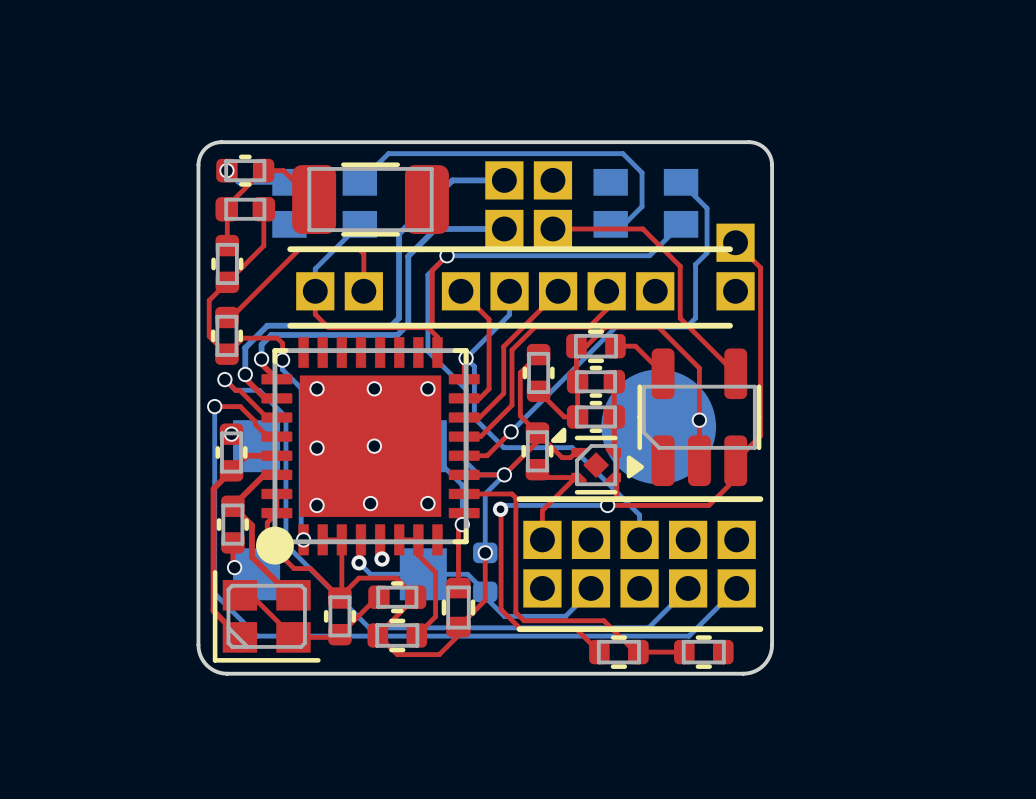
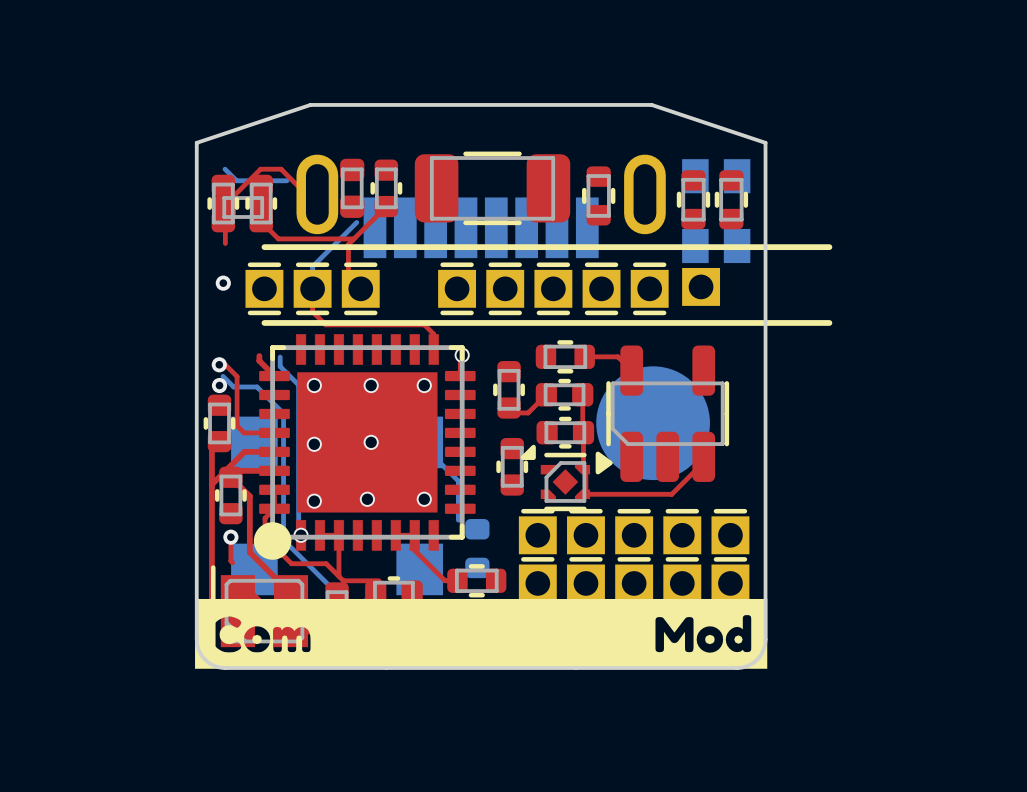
part footprint: [485, 161, 524, 200] -> [414, 151, 571, 226]
board edge: (198, 165) (200, 156) (205, 148) (212, 143) (221, 142) (749, 142) (757, 143) (765, 148) (770, 156) (772, 165) -> (196, 163) (196, 142) (310, 104) (651, 104) (765, 142) (765, 163)
via: (226, 170) -> none
part: (245, 170) -> none
bottom track: (504, 180) (452, 180) (399, 233) (399, 318) (391, 325) (267, 325) (245, 347) (245, 374) -> none
part: (552, 180) -> none
bottom track: (359, 182) (388, 153) (622, 153) (642, 172) (642, 206) (624, 224) (610, 224) -> none
bottom track: (681, 182) (707, 208) (707, 253) (695, 264) (695, 318) (686, 326) (615, 326) (511, 431) -> none
part: none -> (352, 188)
part: none -> (386, 188)
part: none -> (598, 195)
part: (370, 199) -> none
part: none -> (693, 199)
part: none -> (731, 199)
part: (324, 203) -> none
part rotation: 0° (645, 203) -> 90° clockwise (716, 211)
part position: (645, 203) -> (716, 211)
part: none -> (223, 203)
part: none -> (261, 203)
part: none -> (481, 206)
top track: (263, 209) (263, 245) (209, 300) (209, 336) (226, 354) (243, 338) (277, 338) (282, 343) (282, 360) -> none
top track: none -> (261, 221) (278, 238) (353, 238)
bottom track: (681, 224) (649, 255) (447, 255) (427, 274) (427, 351) (466, 389) (466, 462) (478, 474) (504, 474) (485, 493) (485, 552) -> none
bottom track: (504, 228) (435, 228) (408, 256) (408, 324) (397, 334) (271, 334) (261, 344) (261, 359) -> none
part: (504, 228) -> none
top track: (552, 228) (642, 228) (680, 266) (680, 318) (735, 373) -> none
part: (552, 228) -> none
top track: (735, 242) (760, 267) (760, 435) (735, 460) (735, 478) (708, 505) (607, 505) (616, 496) (614, 381) -> none
part: (735, 242) -> none
line: none -> (264, 247) (287, 247)
line: none -> (723, 247) (829, 247)
top track: (447, 255) (432, 270) (432, 323) (428, 327) -> none
via: (447, 255) -> none
part: (227, 263) -> none
part footprint: [296, 272, 335, 311] -> [293, 262, 332, 316]
part footprint: [344, 272, 383, 311] -> [341, 262, 380, 316]
part footprint: [441, 272, 481, 311] -> [438, 262, 477, 316]
part footprint: [490, 272, 529, 311] -> [486, 262, 525, 316]
part footprint: [538, 272, 578, 311] -> [534, 262, 573, 316]
part footprint: [587, 272, 626, 311] -> [582, 262, 621, 316]
part footprint: [636, 272, 675, 311] -> [630, 262, 669, 316]
via: none -> (223, 283)
part: none -> (701, 286)
part: none -> (264, 288)
top track: (363, 291) (363, 254) (359, 249) (299, 249) (231, 317) (226, 317) -> (360, 288) (348, 276) (348, 244) (386, 206)
top track: (460, 291) (489, 319) (489, 389) (479, 398) (464, 398) -> none
bottom track: (509, 291) (509, 314) (466, 358) (474, 366) (474, 418) (503, 447) (572, 447) (639, 515) (639, 539) -> none
top track: (558, 291) (503, 346) (503, 393) (479, 417) (464, 417) -> none
top track: (606, 291) (606, 309) (589, 327) (535, 327) (512, 350) (512, 405) (480, 436) (464, 436) -> none
part: (735, 291) -> none
line: none -> (264, 322) (287, 322)
line: none -> (723, 322) (829, 322)
part: (226, 335) -> none
part position: (595, 346) -> (565, 356)
top track: (615, 346) (635, 346) (663, 373) -> none
top track: (538, 354) (520, 372) (520, 415) (562, 457) (570, 457) (575, 452) -> none
via: (261, 359) -> none
top track: none -> (584, 356) (617, 356) (631, 370)
via: (282, 360) -> none
via: none -> (219, 364)
part: (538, 372) -> none
top track: (245, 374) (245, 378) (265, 398) (276, 398) -> none
via: (245, 374) -> none
top track: (224, 379) (235, 390) (239, 390) (266, 417) (276, 417) -> none
via: (224, 379) -> none
part: (595, 381) -> none
via: none -> (219, 385)
top track: (538, 391) (564, 416) (577, 416) (576, 346) (586, 346) (605, 327) (658, 327) (699, 368) (699, 460) -> none
part: none -> (509, 389)
top track: none -> (546, 394) (528, 412) (512, 412)
part: none -> (564, 394)
top track: none -> (582, 394) (583, 467) (585, 469) (585, 494) (671, 494) (703, 462) (703, 456)
top track: (214, 406) (240, 406) (267, 436) -> (219, 364) (225, 364) (237, 376) (237, 425) (244, 432) (265, 432)
bottom track: (214, 406) (214, 593) (257, 636) (689, 636) (736, 588) -> none
via: (214, 406) -> none
part: (595, 416) -> none
part position: (694, 417) -> (662, 413)
via: (699, 420) -> none
part: none -> (219, 423)
top track: (511, 431) (487, 455) (464, 455) -> none
via: (511, 431) -> none
top track: (537, 432) (537, 441) (504, 474) (464, 474) -> none
via: (231, 434) -> none
part: none -> (565, 432)
part: (537, 451) -> none
part: (231, 452) -> none
part position: (586, 461) -> (555, 477)
top track: (537, 469) (545, 477) (575, 477) (542, 510) (542, 539) -> none
part: none -> (512, 466)
top track: (264, 474) (232, 506) (251, 525) -> (261, 470) (237, 470) (230, 477) (249, 496) (249, 520)
via: (504, 474) -> none
top track: (464, 493) (512, 493) (515, 497) (515, 612) (524, 620) (603, 620) (635, 652) (684, 652) -> none
part: none -> (230, 495)
line: (519, 499) (760, 499) -> none
bottom track: (607, 505) (504, 505) (500, 509) -> none
via: (607, 505) -> none
via: (500, 509) -> none
top track: (501, 509) (501, 609) (520, 629) (576, 629) (599, 652) -> none
top track: (464, 513) (464, 522) (458, 528) (458, 588) -> none
part footprint: [523, 520, 562, 559] -> [518, 508, 557, 562]
part footprint: [571, 520, 611, 559] -> [567, 508, 605, 562]
part footprint: [620, 520, 659, 559] -> [615, 508, 654, 562]
part footprint: [669, 520, 708, 559] -> [663, 508, 702, 562]
part footprint: [717, 520, 756, 559] -> [711, 508, 750, 562]
part: (232, 524) -> none
via: (462, 524) -> none
via: none -> (230, 537)
top track: (485, 552) (485, 600) (458, 627) (458, 635) (439, 654) (397, 654) (378, 635) -> none
via: (485, 552) -> none
via: (382, 558) -> none
bottom track: (359, 562) (370, 574) (467, 574) (485, 591) (485, 597) (504, 616) (565, 616) (590, 590) (590, 588) -> none
via: (359, 562) -> none
via: (234, 567) -> none
top track: (310, 568) (339, 597) (341, 596) (341, 581) -> (307, 563) (326, 563) (343, 580) (378, 580)
top track: (435, 572) (435, 616) (416, 635) -> (431, 567) (445, 580) (457, 580)
part position: (485, 572) -> (477, 548)
top track: (339, 597) (359, 578) (396, 578) (415, 597) (377, 635) -> none
drawing: none -> [195, 598, 768, 669]
part rotation: 0° (458, 607) -> 90° clockwise (476, 580)
line: (519, 629) (760, 629) -> none
part: (397, 635) -> none
part: (618, 652) -> none
part: (703, 652) -> none

